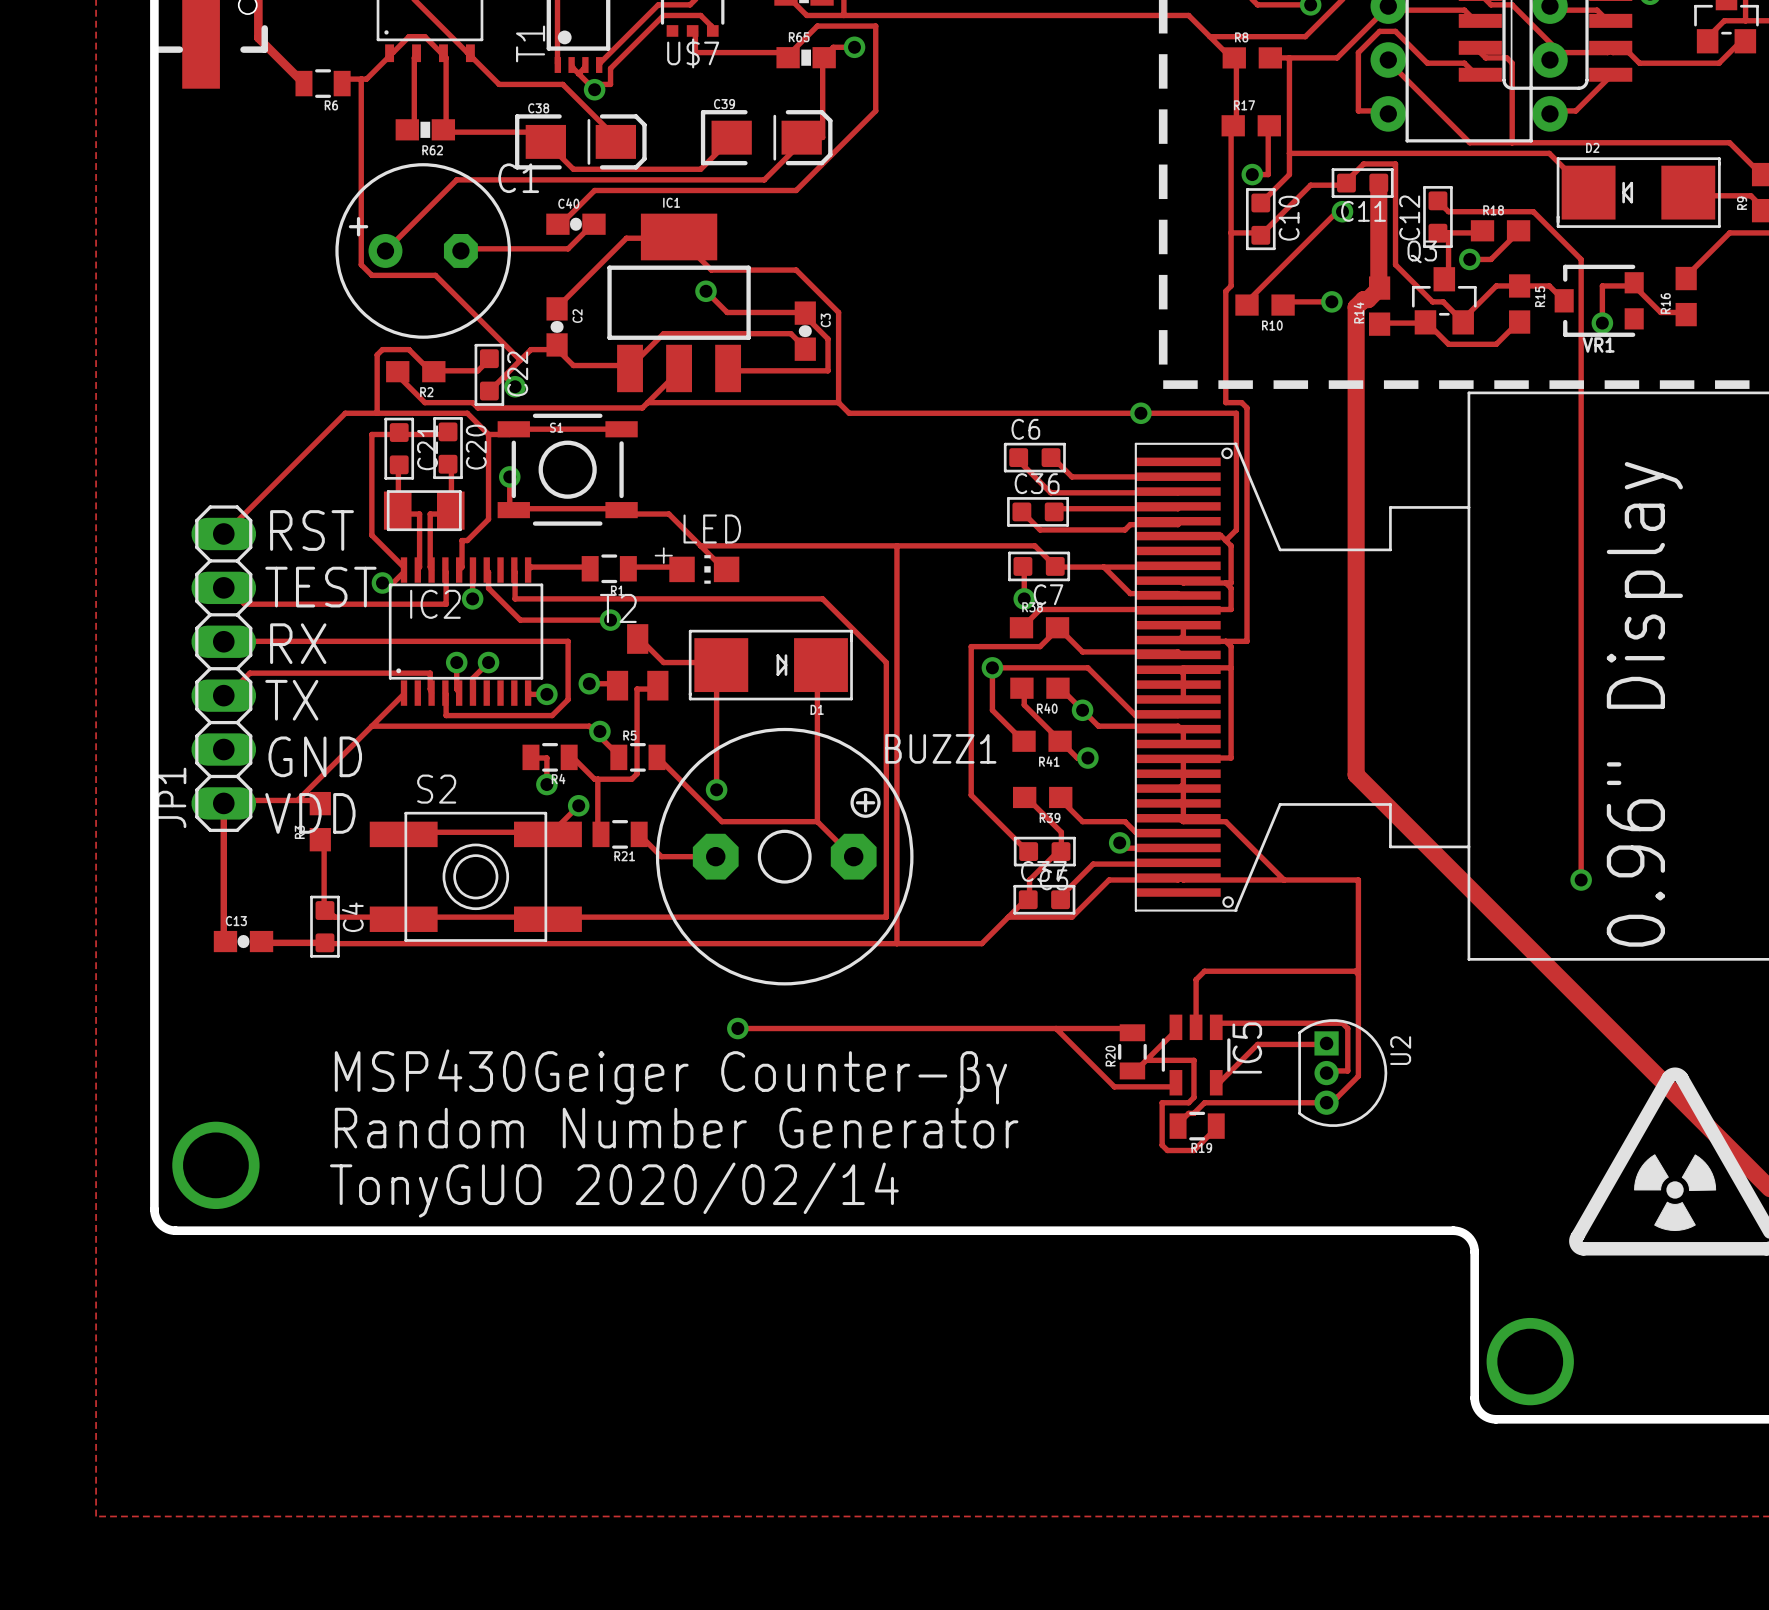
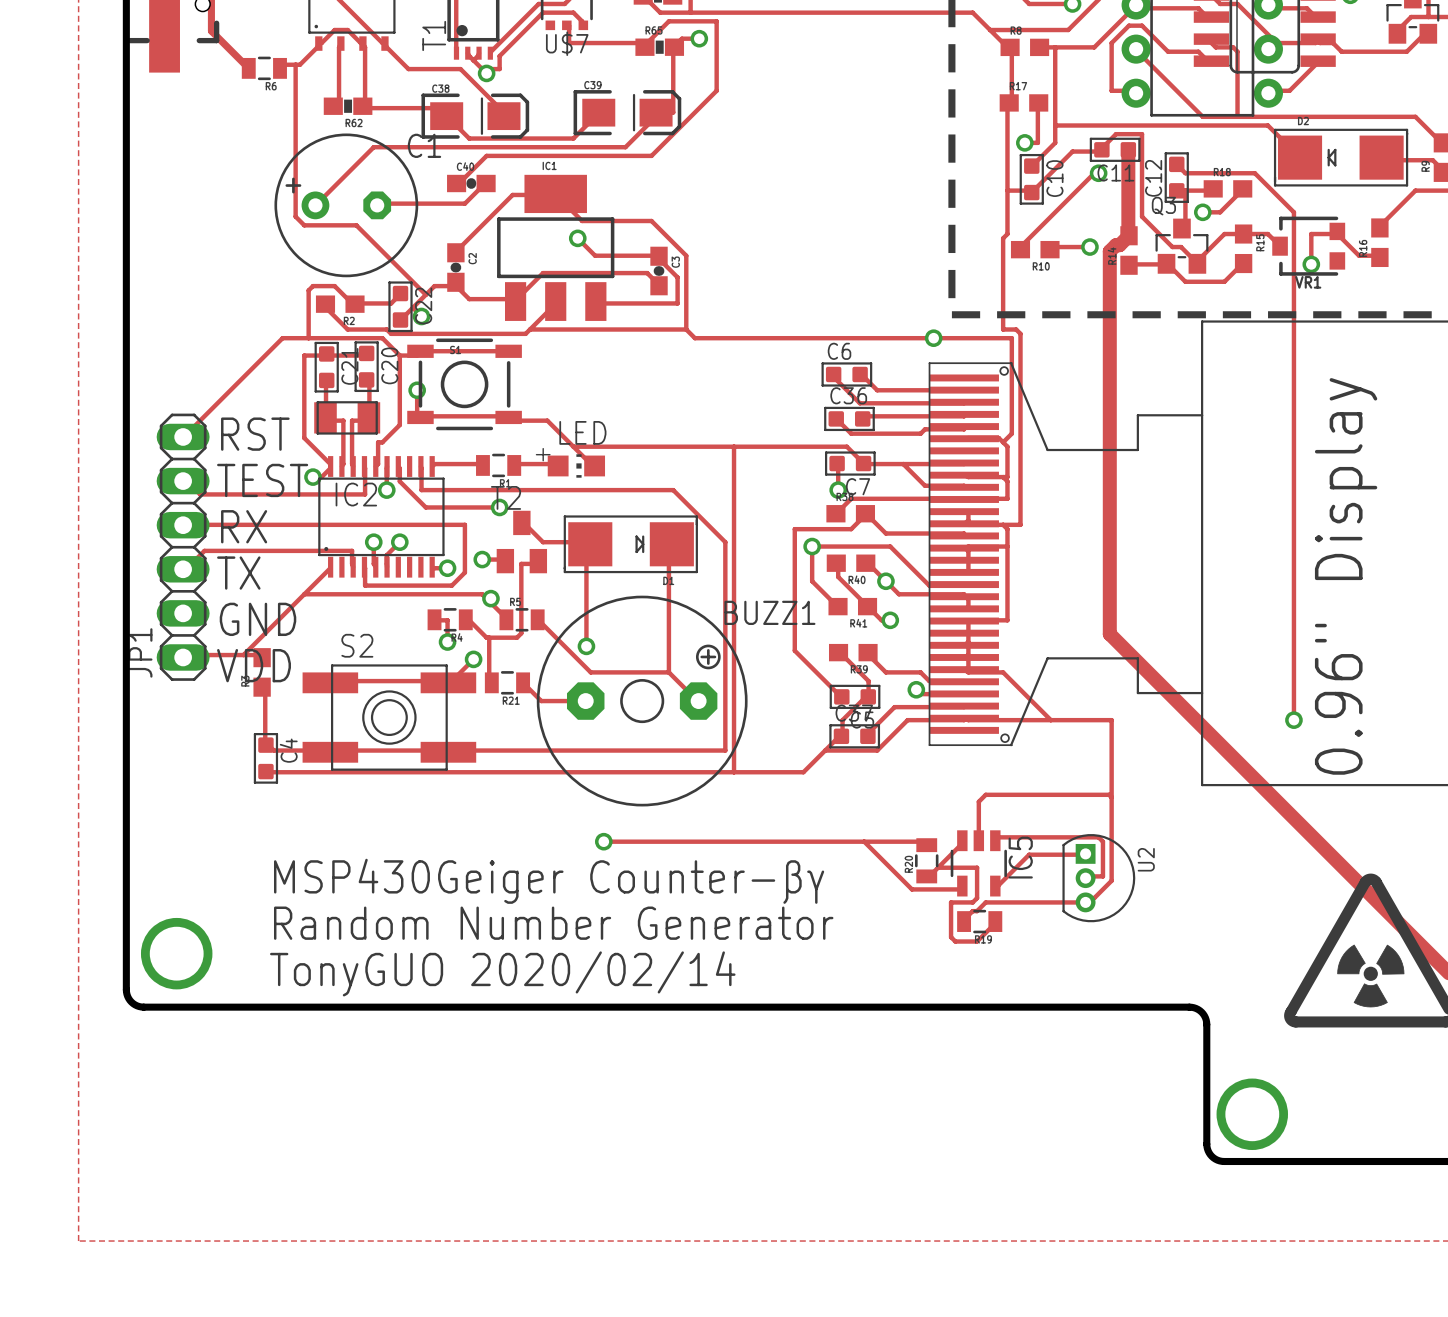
track: (223, 803) (223, 939) (225, 941) -> none
C13: (243, 941) -> none
track: (261, 941) (324, 942) -> none

